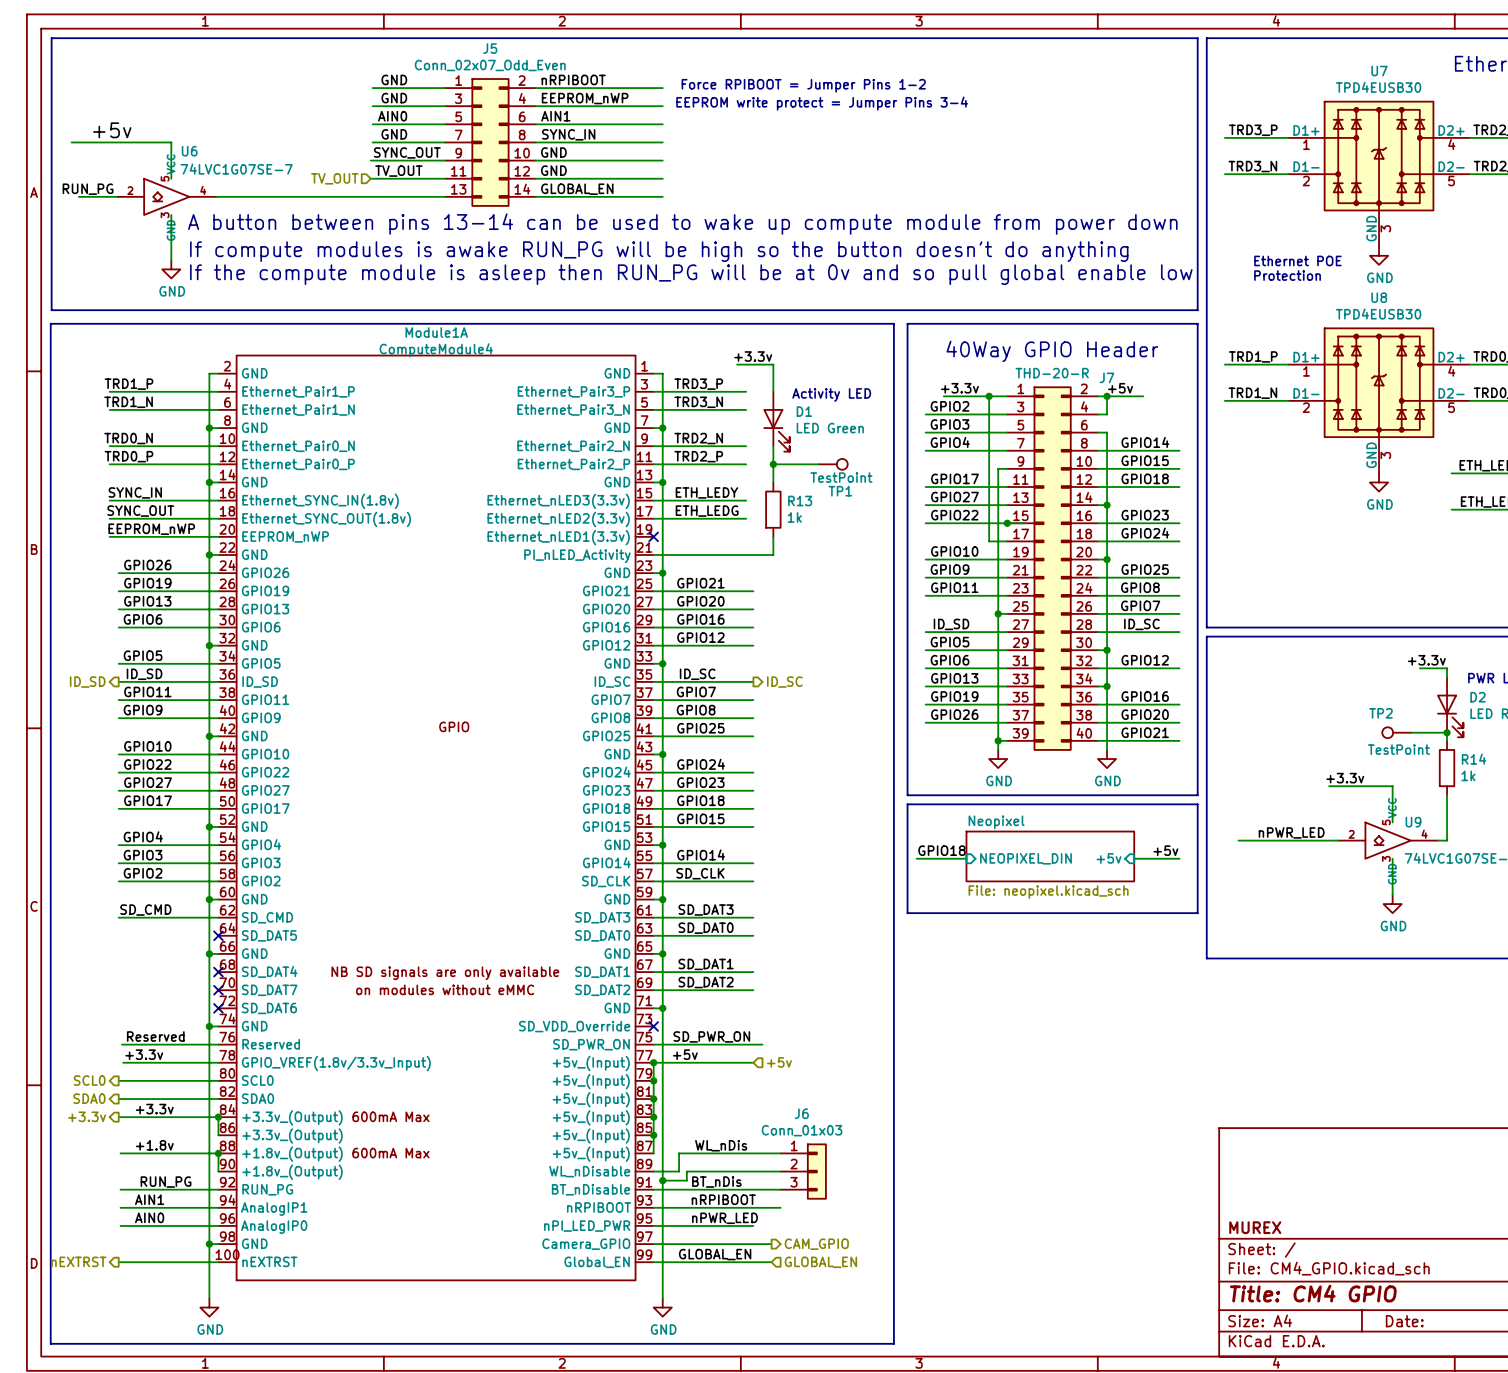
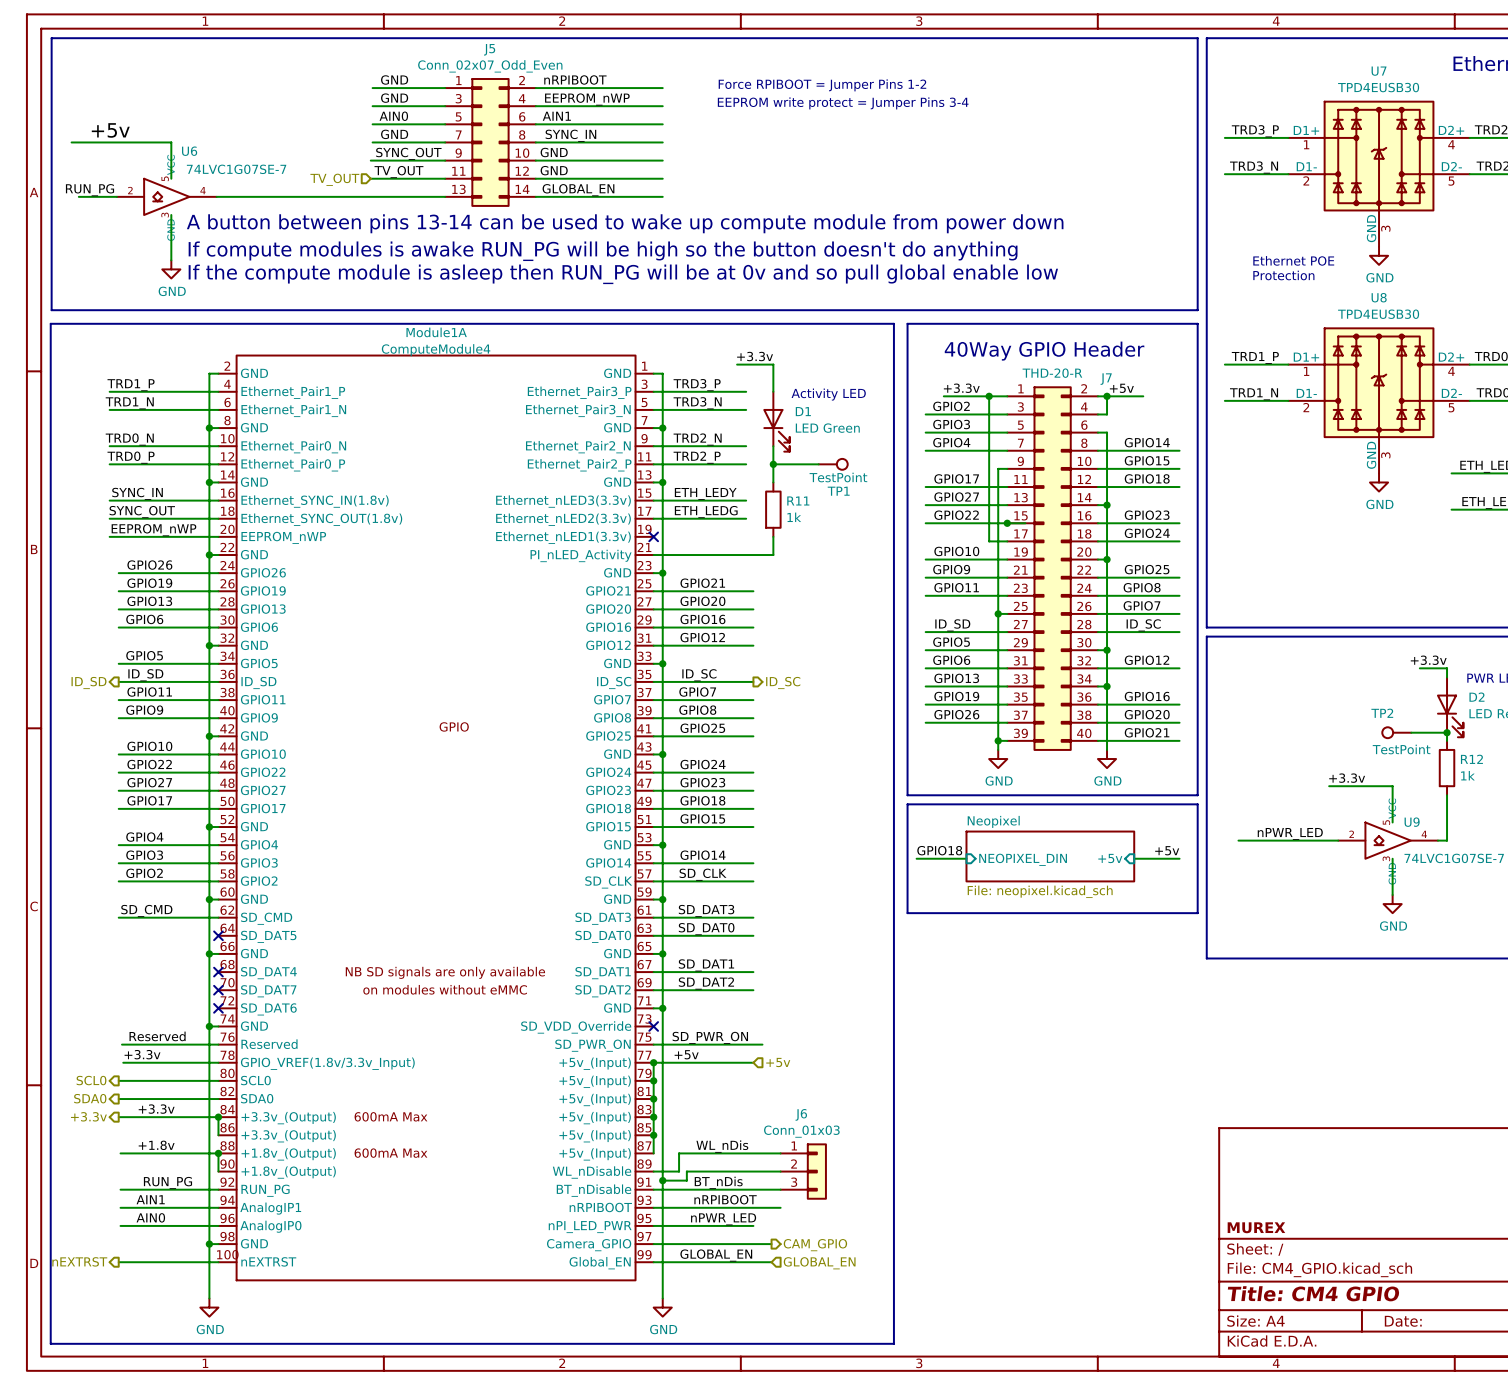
R13 name: R13 (800, 500) -> R11 (798, 500)
R14 name: R14 (1474, 759) -> R12 (1471, 759)

